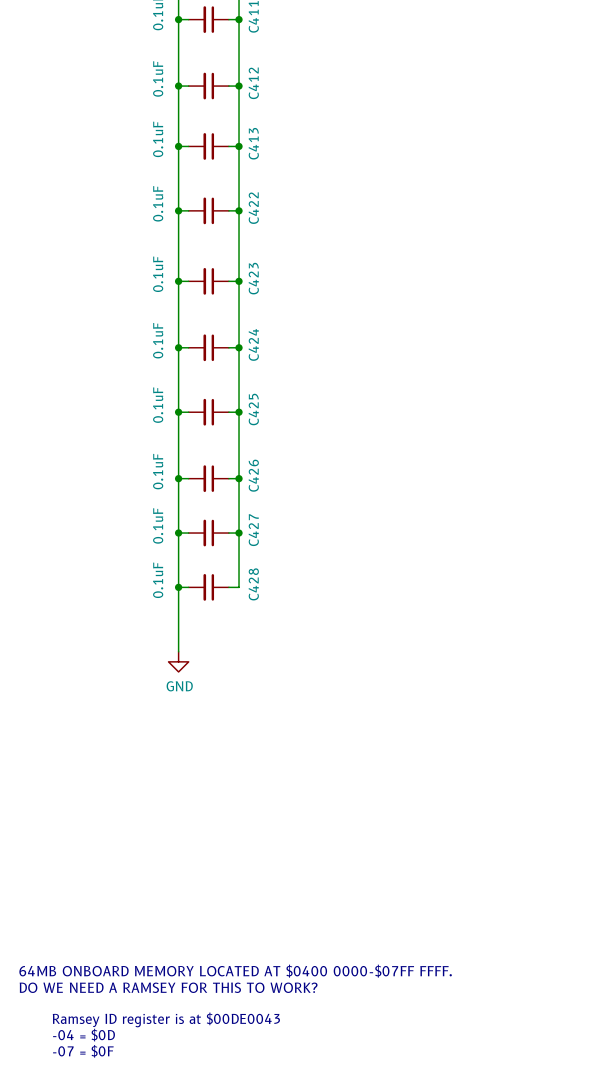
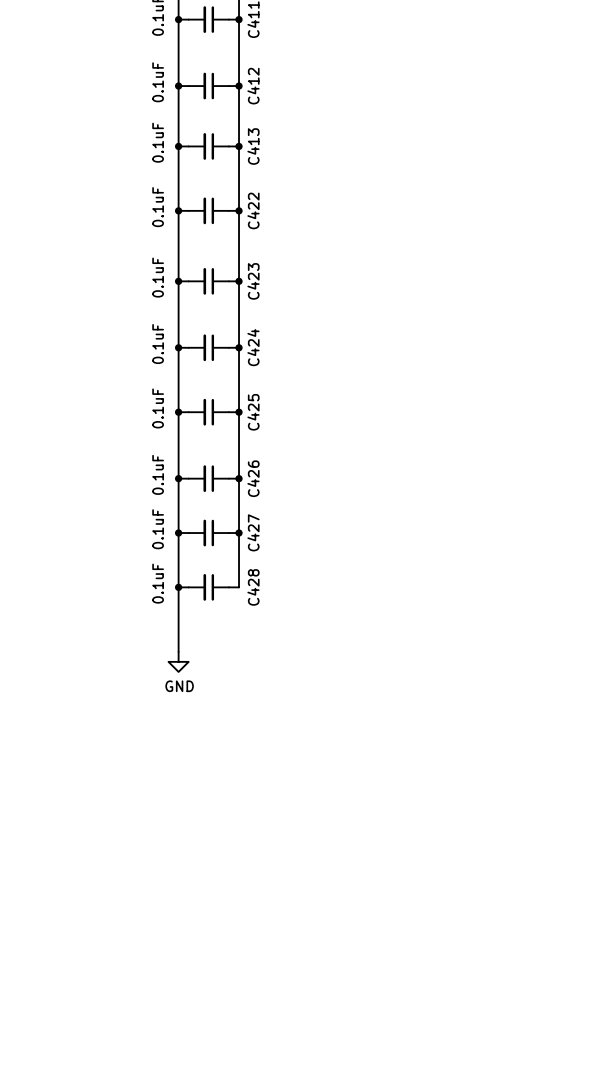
text: 64MB ONBOARD MEMORY LOCATED AT $0400 0000-$07FF FFFF. (235, 971) -> none
text: DO WE NEED A RAMSEY FOR THIS TO WORK? (168, 987) -> none
text: Ramsey ID register is at $00DE0043 (166, 1019) -> none
text: -04 = $0D (84, 1035) -> none
text: -07 = $0F (83, 1051) -> none

